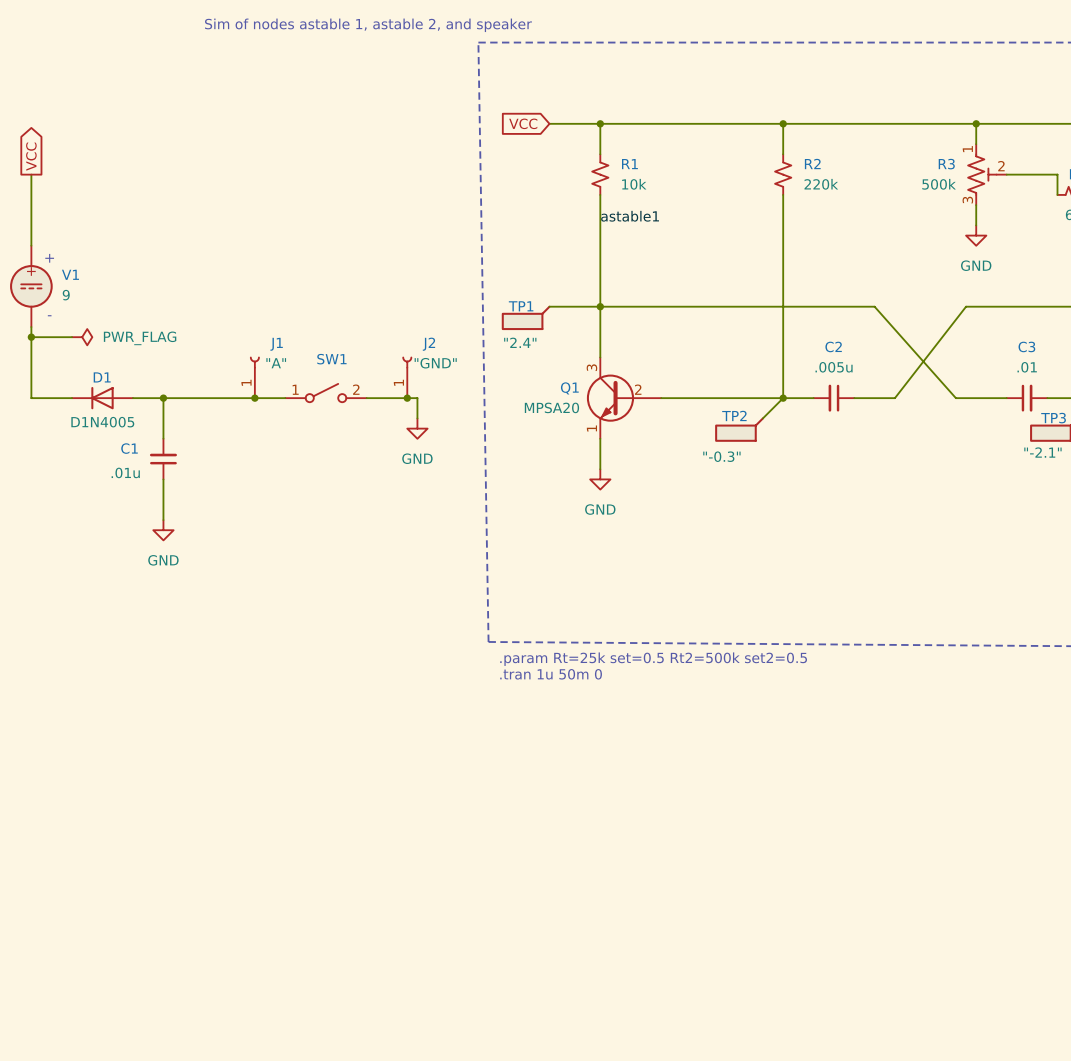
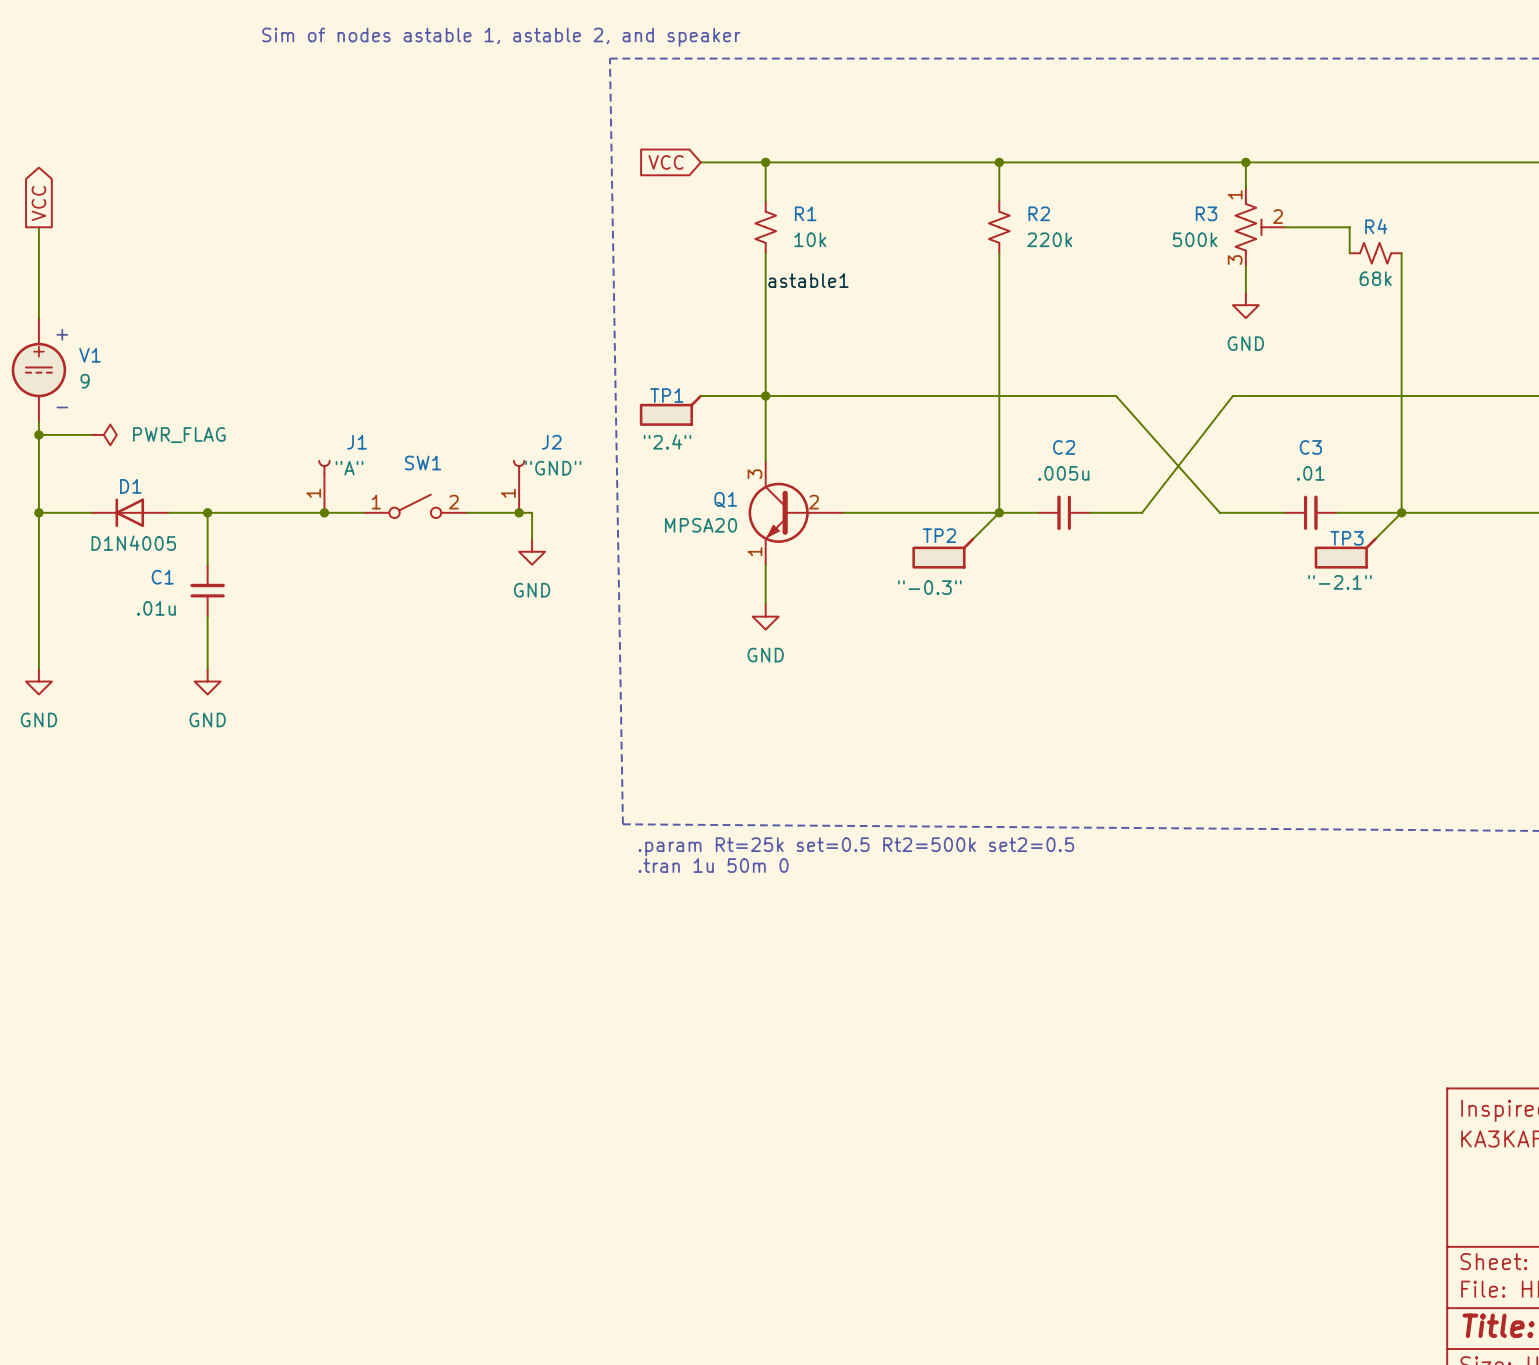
wire: none -> (38, 512) (38, 668)
junction: none -> (38, 512)
power symbol: none -> GND (38, 681)

